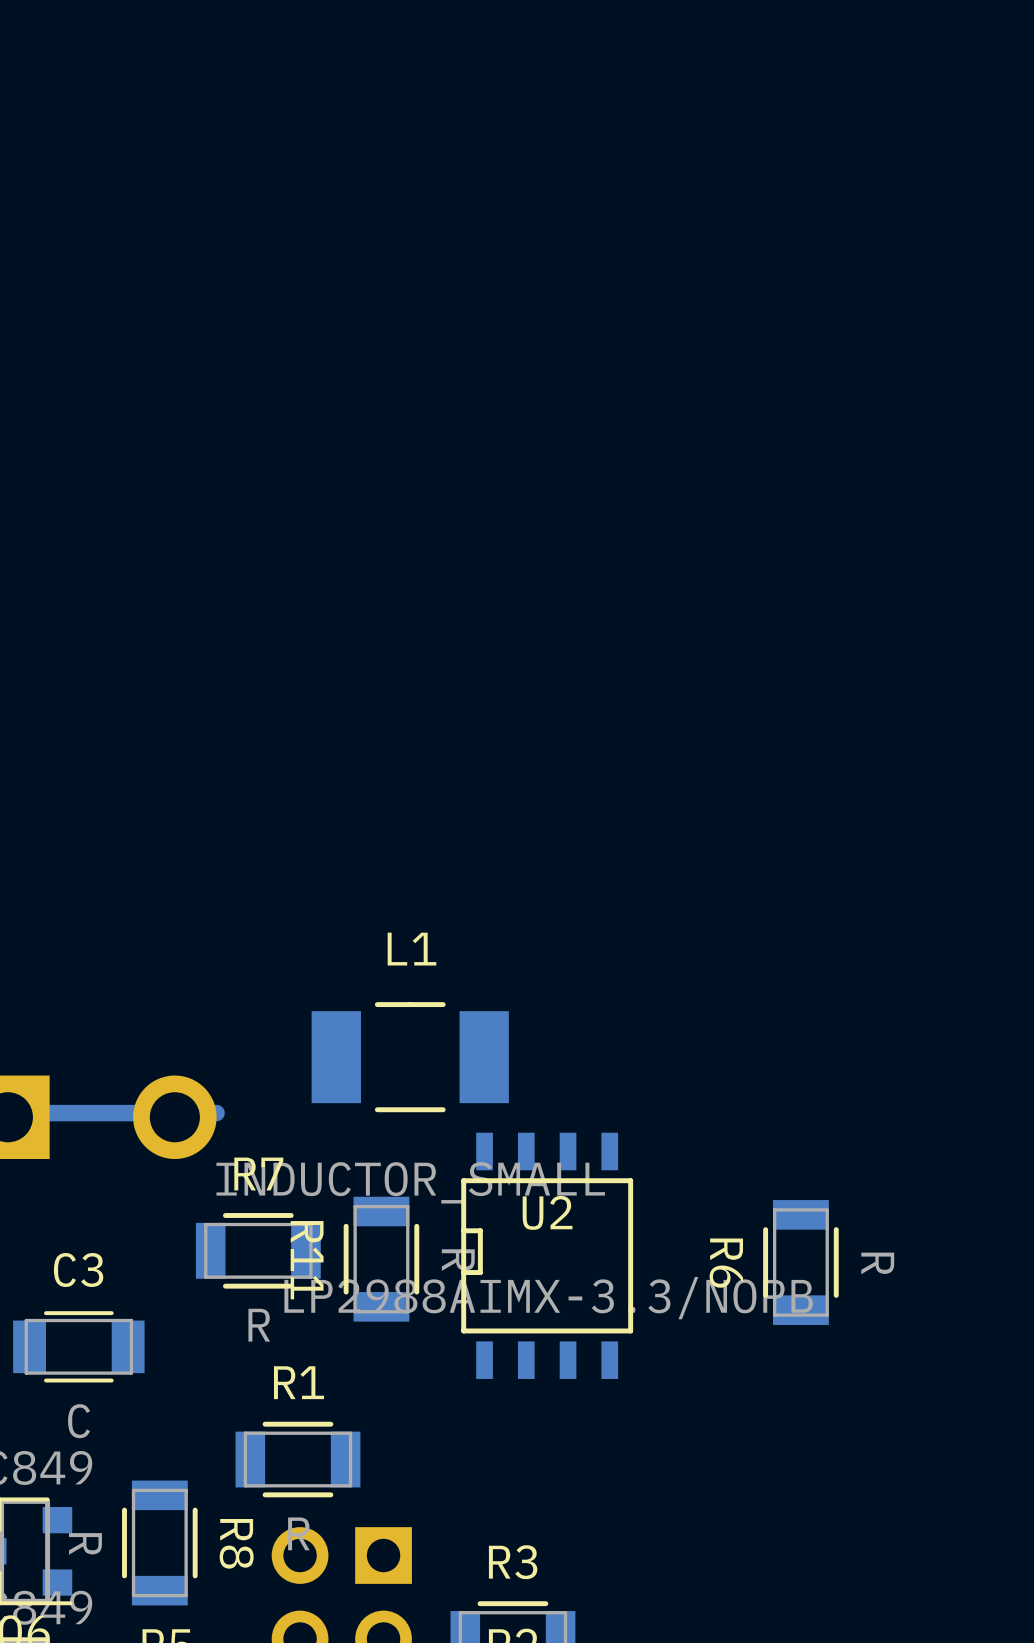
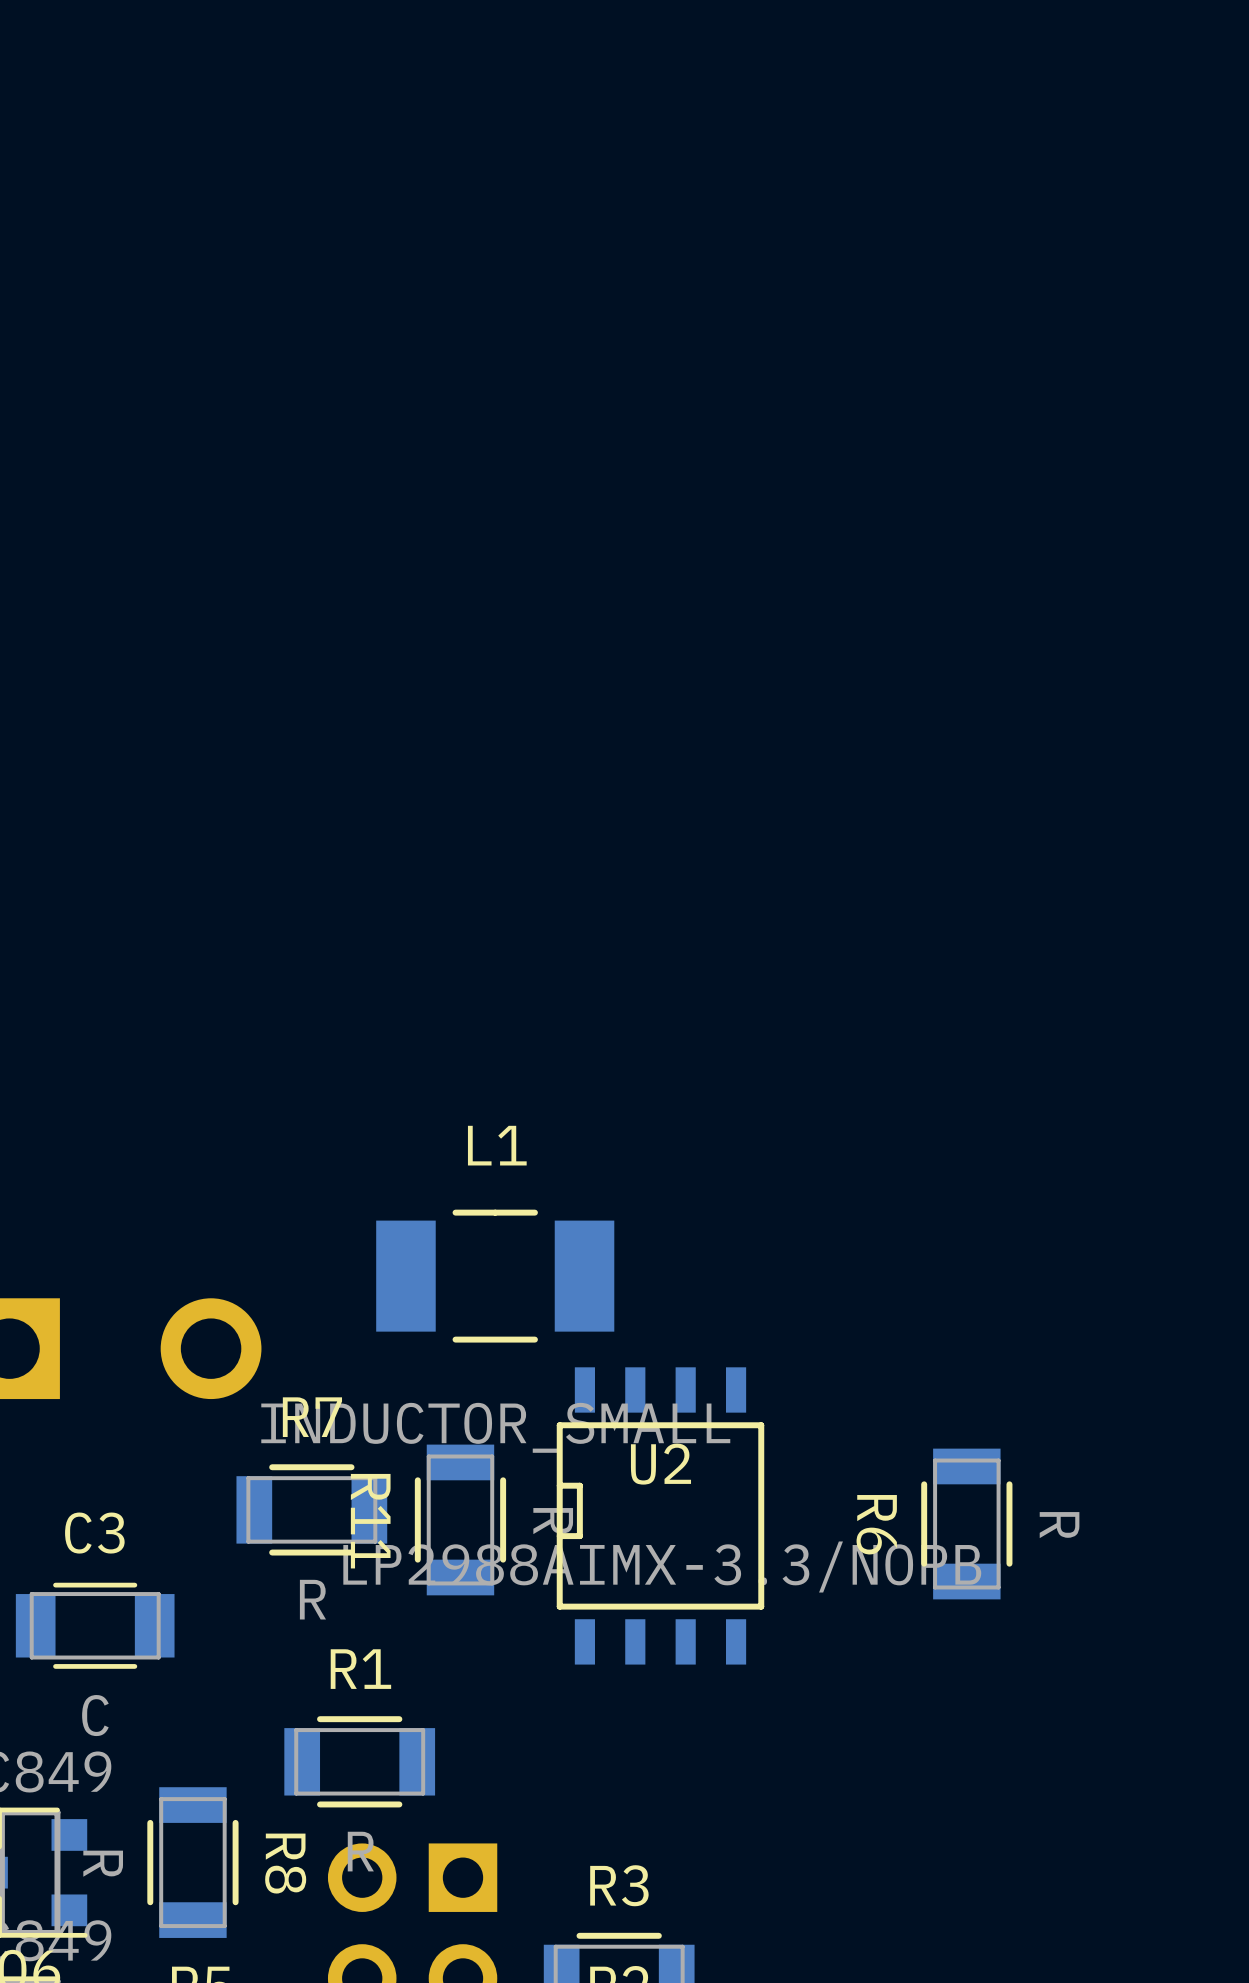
bottom track: (216, 1113) (16, 1113) -> none

